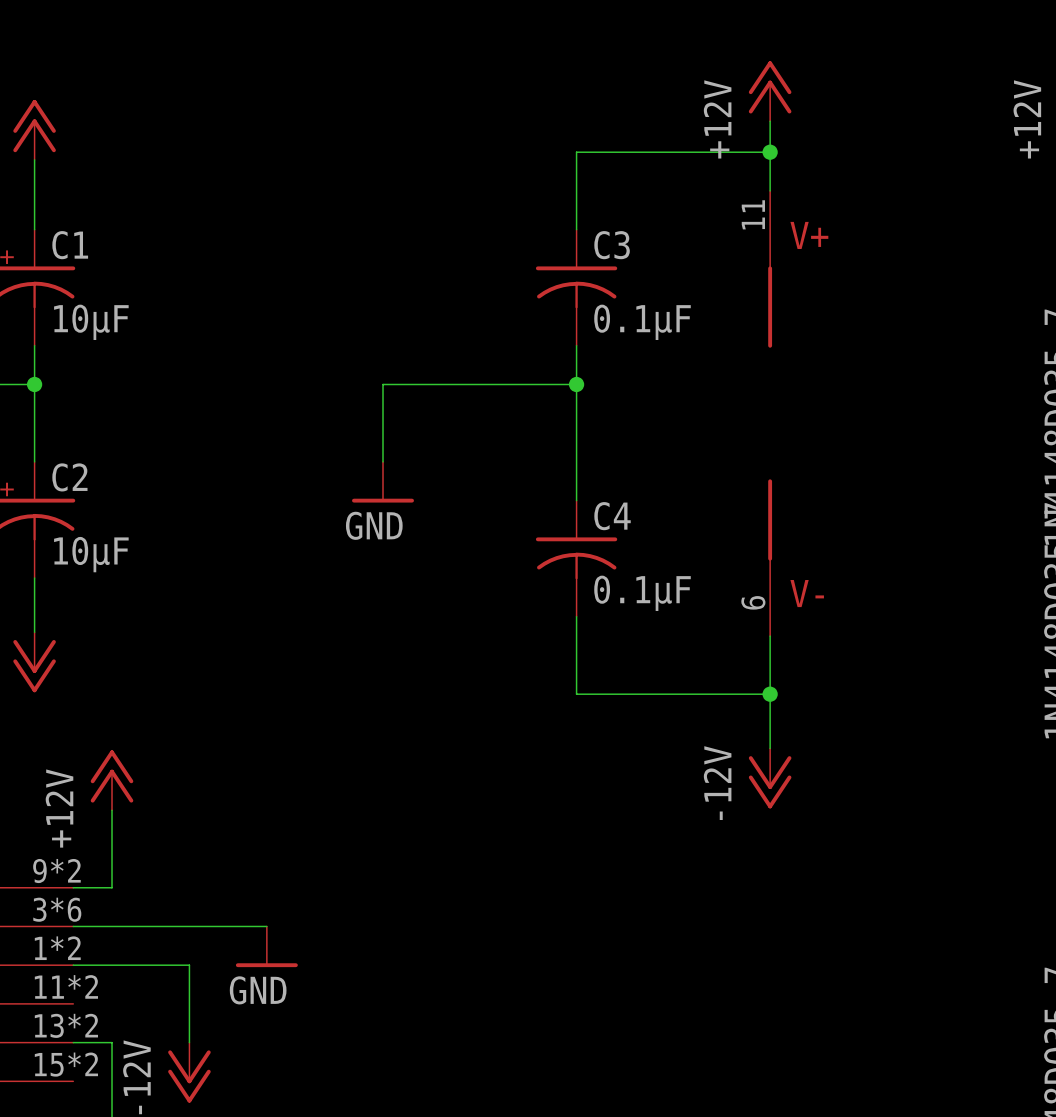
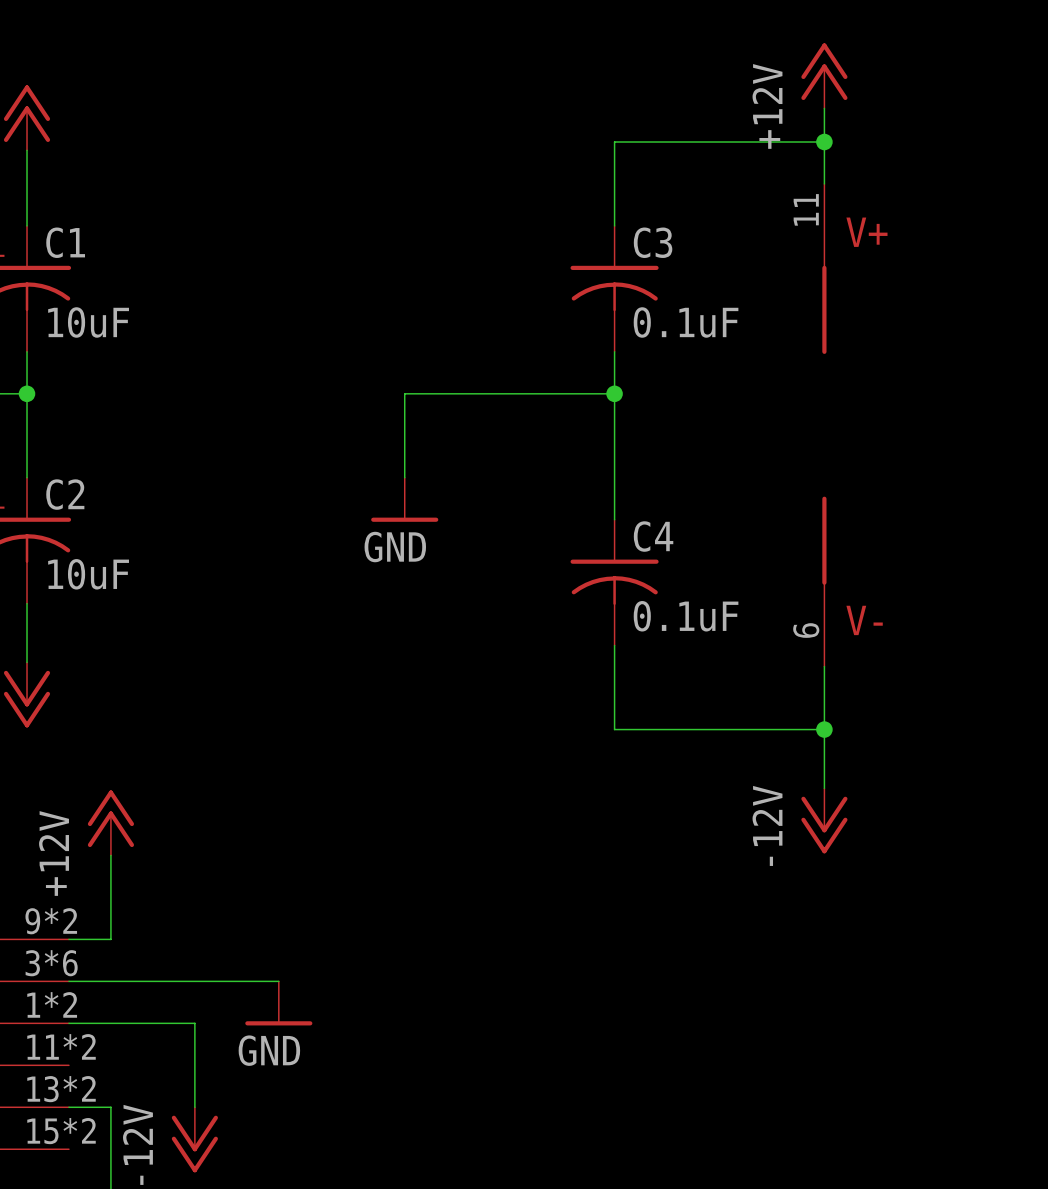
C1 value: 10μF (91, 322) -> 10uF (88, 322)
C3 value: 0.1μF (642, 322) -> 0.1uF (686, 322)
C2 value: 10μF (91, 554) -> 10uF (88, 574)
C4 value: 0.1μF (642, 593) -> 0.1uF (686, 616)

